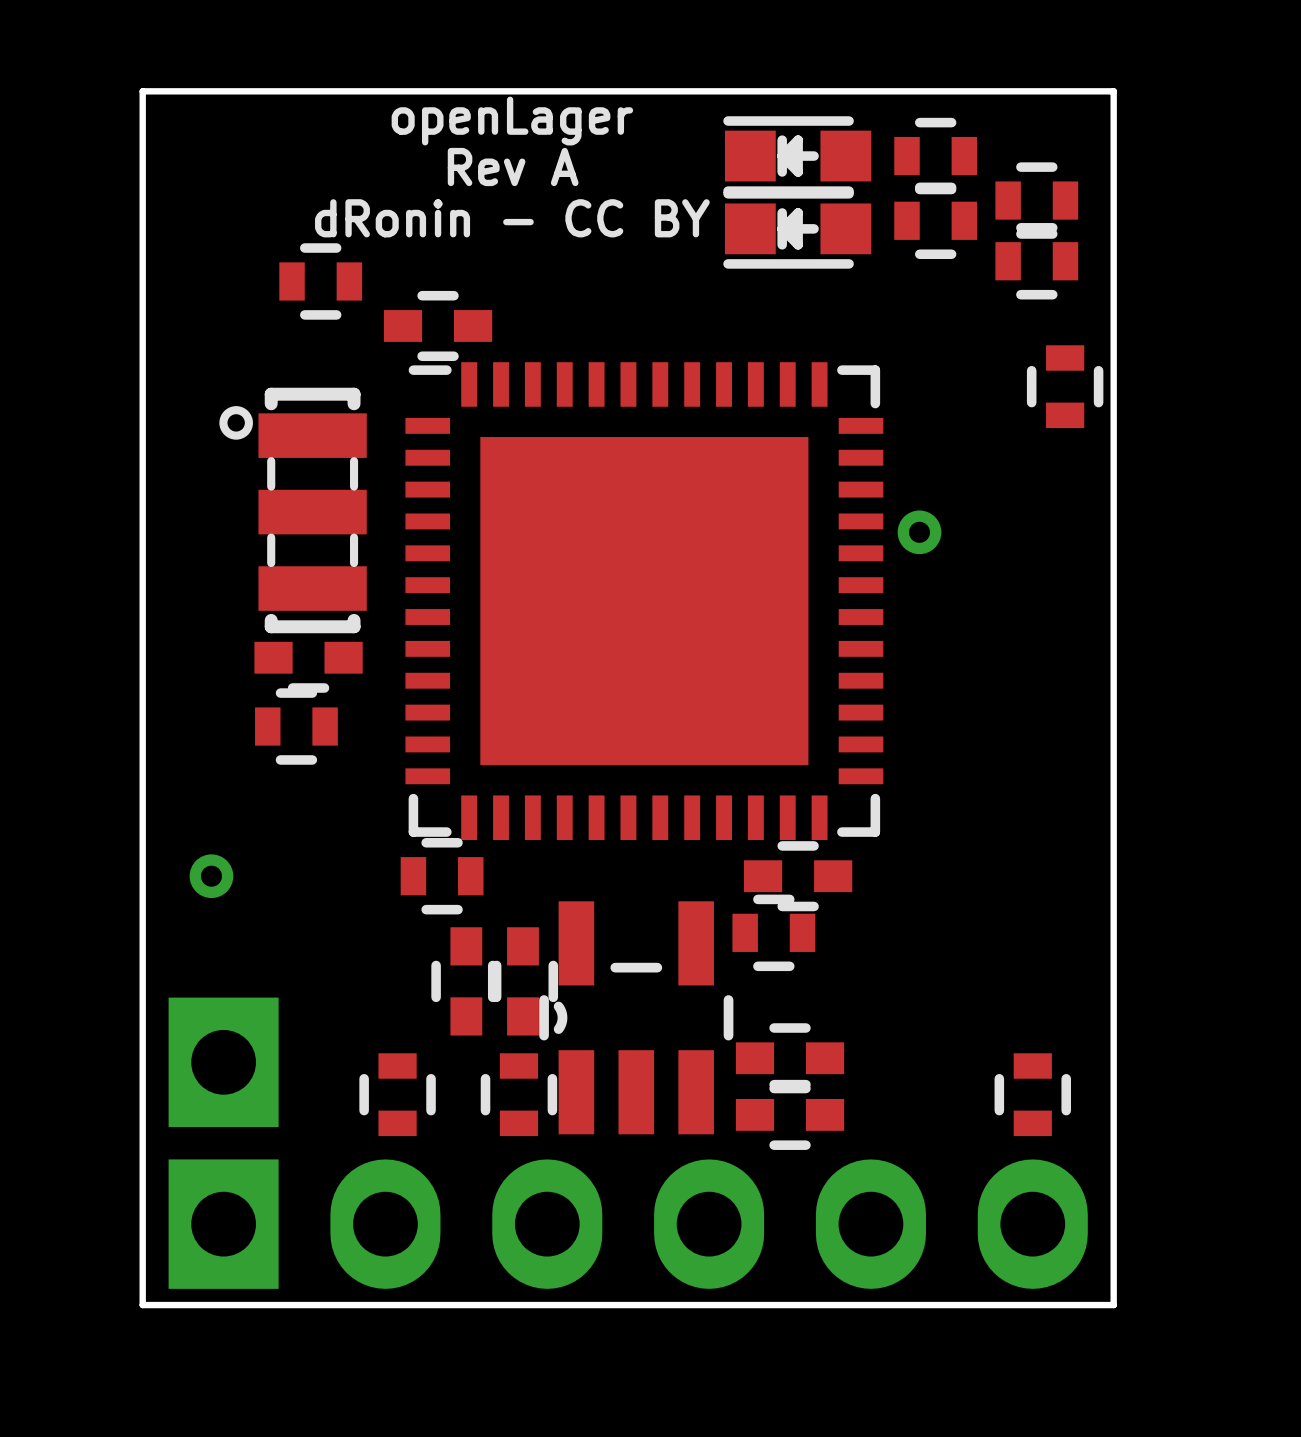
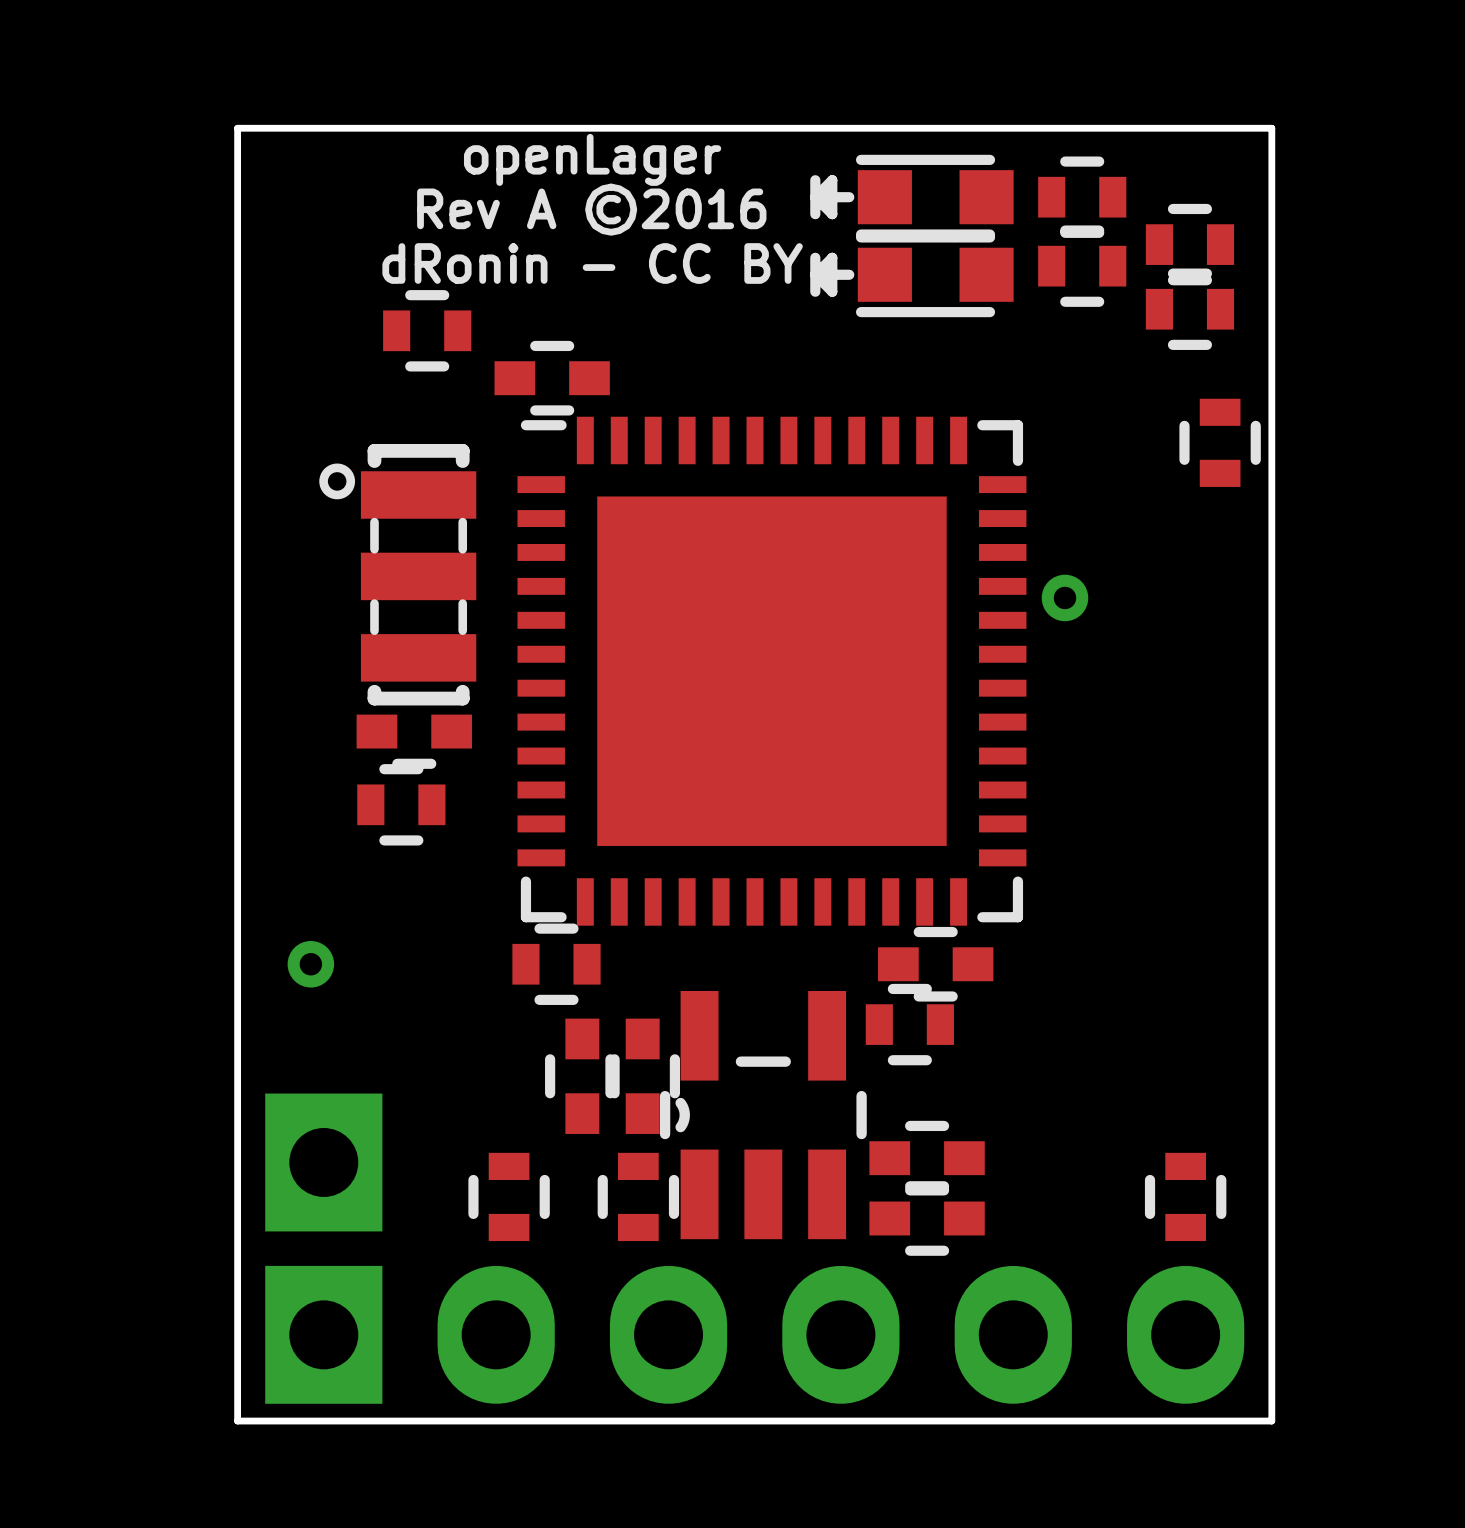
part footprint: [723, 116, 872, 196] -> [810, 154, 1014, 240]
text position: openLager (512, 121) -> openLager (592, 159)
text: Rev A (513, 167) -> Rev A ©2016 (591, 209)
part footprint: [723, 189, 872, 269] -> [810, 232, 1014, 318]
text position: dRonin - CC BY (512, 218) -> dRonin - CC BY (592, 263)

